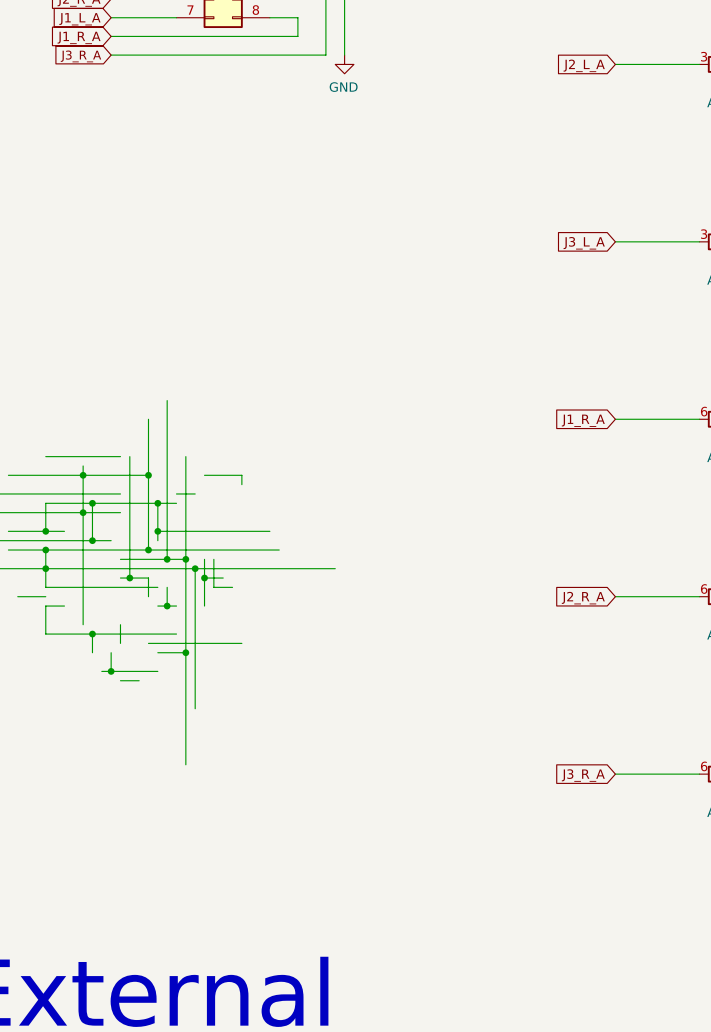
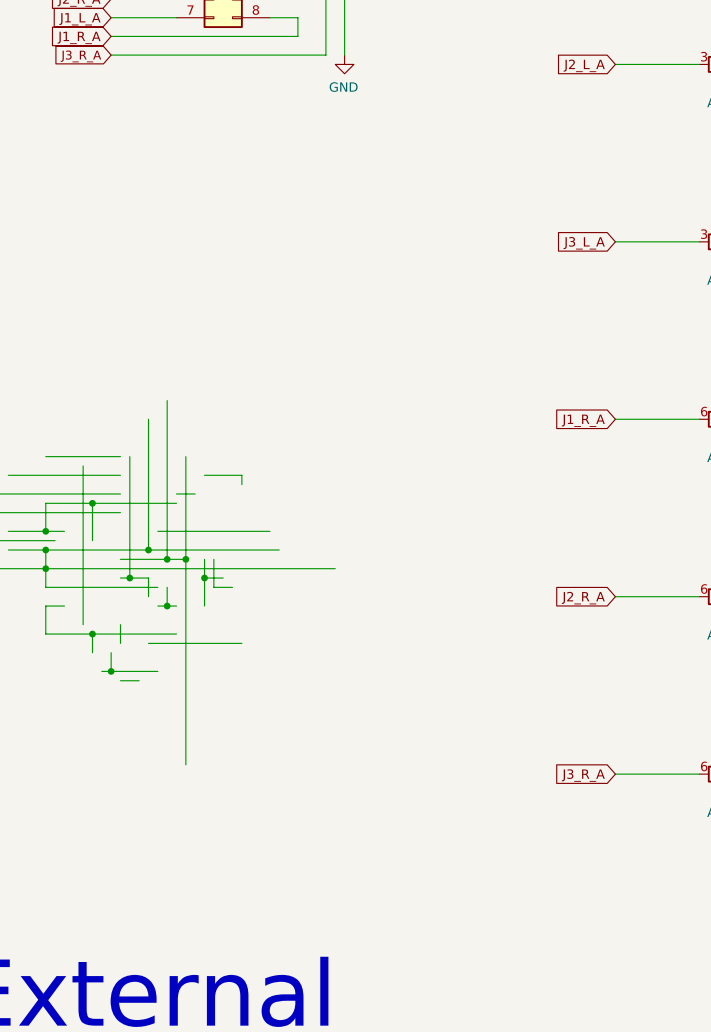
junction: (83, 475) -> none
wire: (120, 475) (148, 475) -> none
junction: (148, 475) -> none
wire: (157, 503) (157, 540) -> none
junction: (157, 503) -> none
junction: (83, 512) -> none
junction: (157, 531) -> none
wire: (55, 540) (111, 540) -> none
junction: (92, 540) -> none
wire: (195, 568) (195, 708) -> none
junction: (195, 568) -> none
wire: (17, 596) (45, 596) -> none
wire: (157, 652) (185, 652) -> none
junction: (185, 652) -> none

